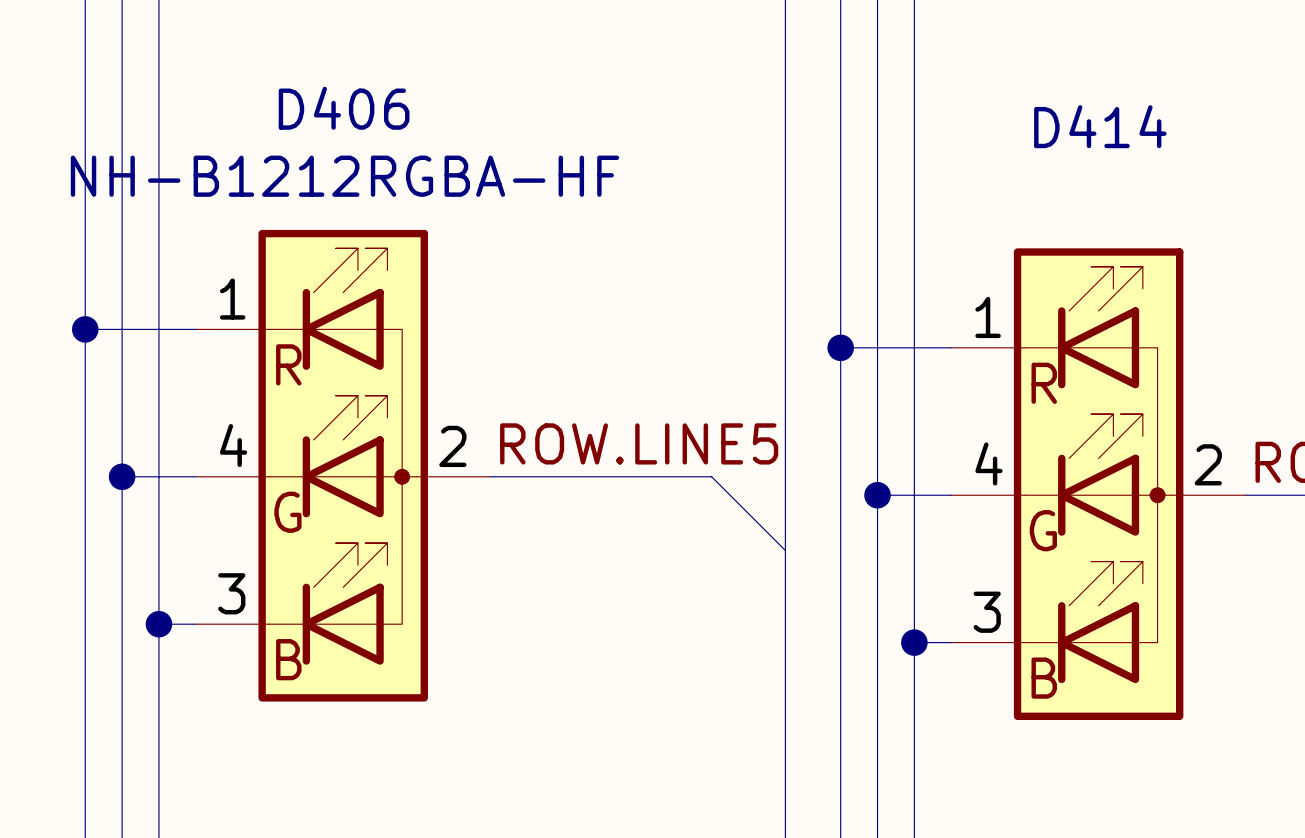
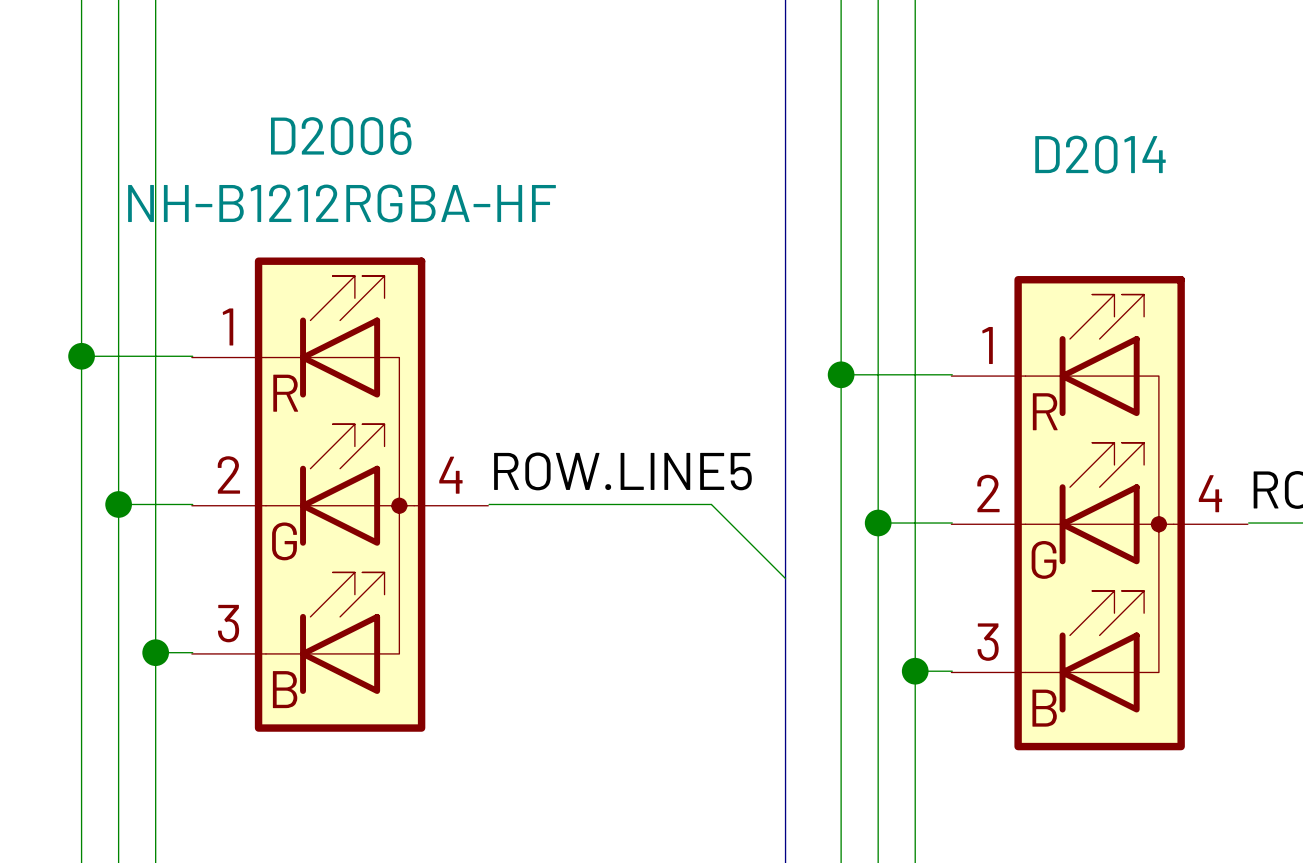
D406: NH-B1212RGBA-HF (343, 465) -> none
D2006: none -> NH-B1212RGBA-HF (340, 494)
D414: (1098, 484) -> none
D2014: none -> (1099, 513)

